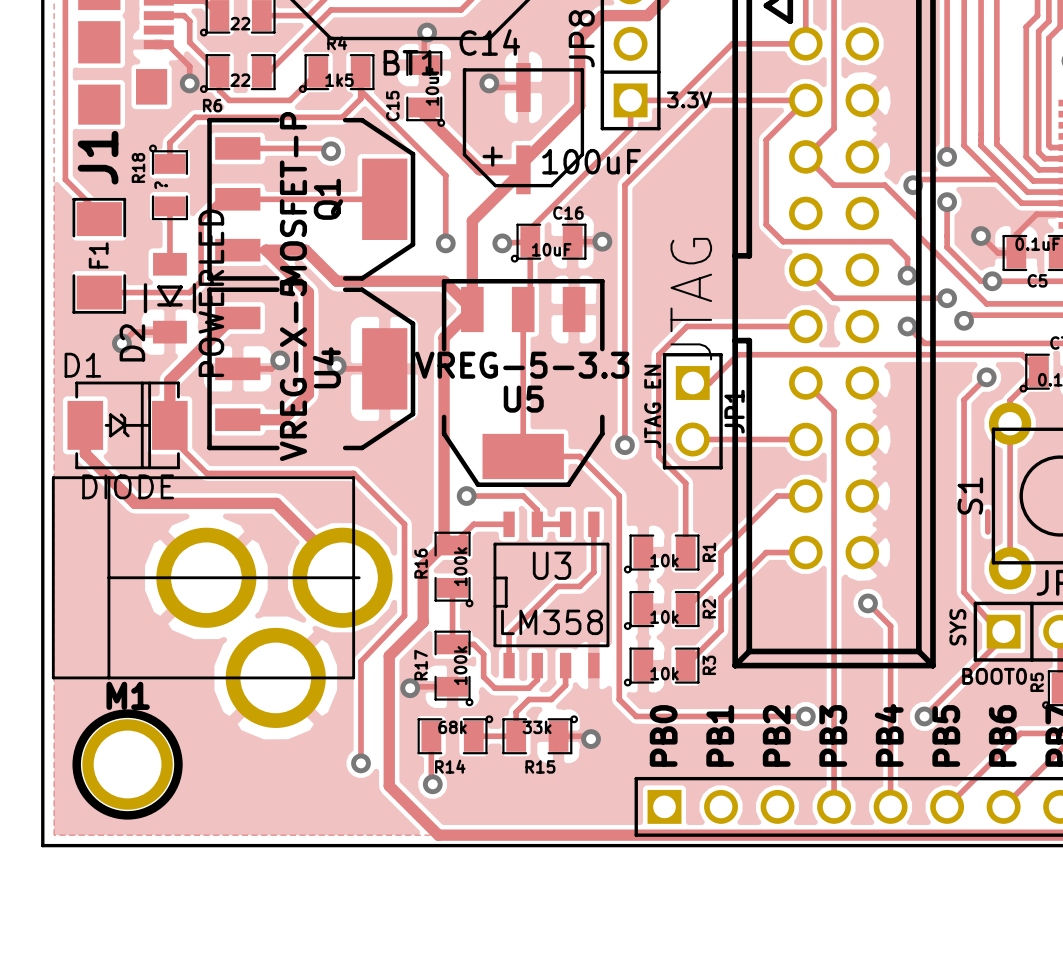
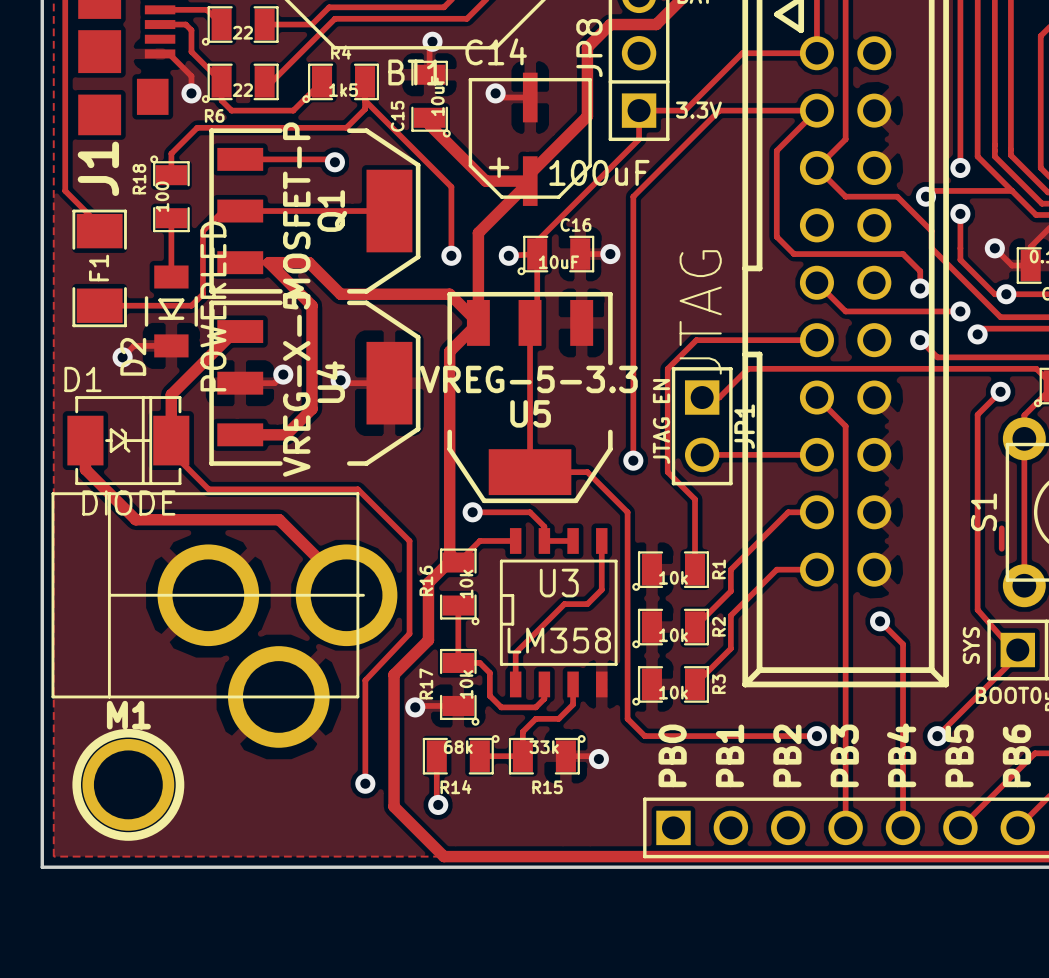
R18 value: ? (161, 185) -> 100 (162, 196)
R16 value: 100k (460, 566) -> 10k (466, 584)
R17 value: 100k (460, 665) -> 10k (466, 684)

